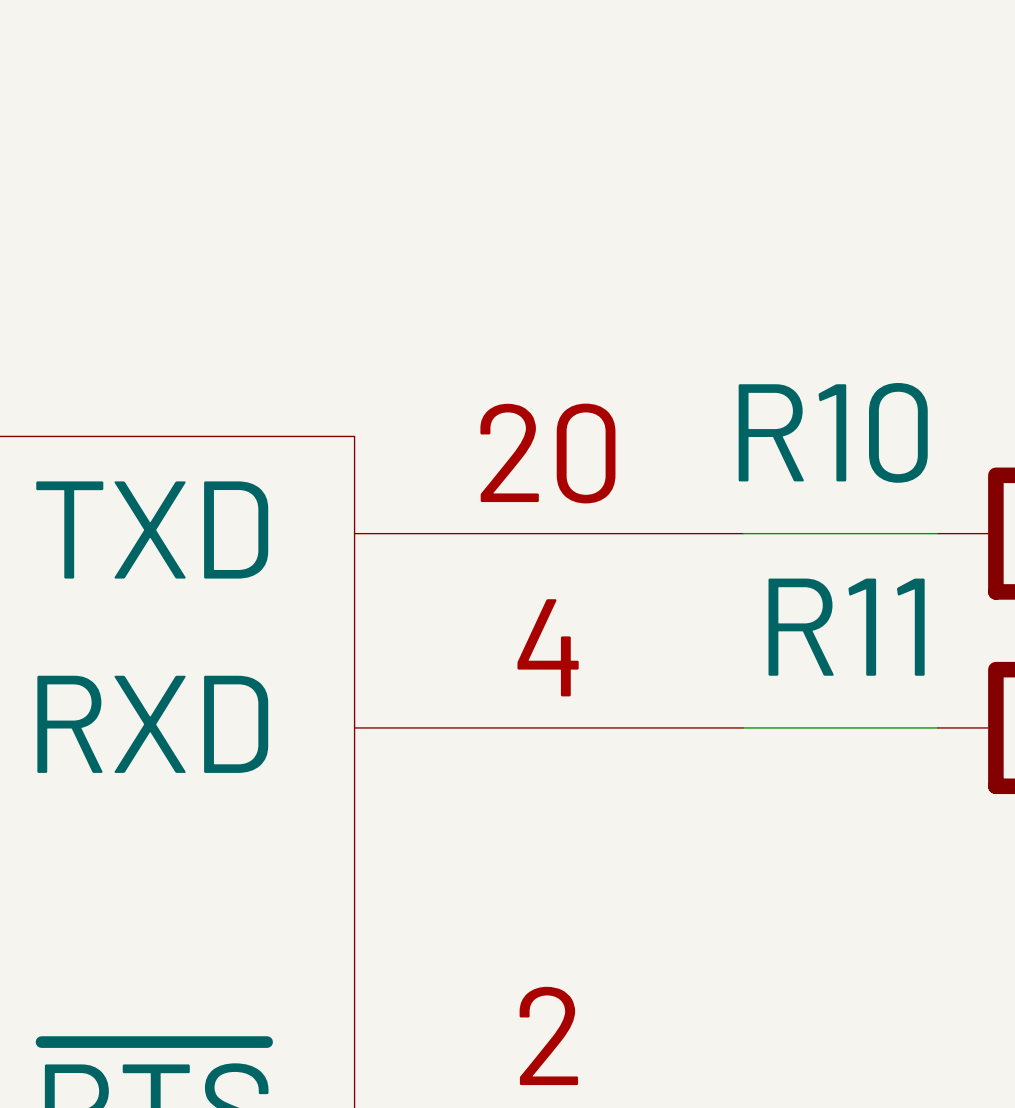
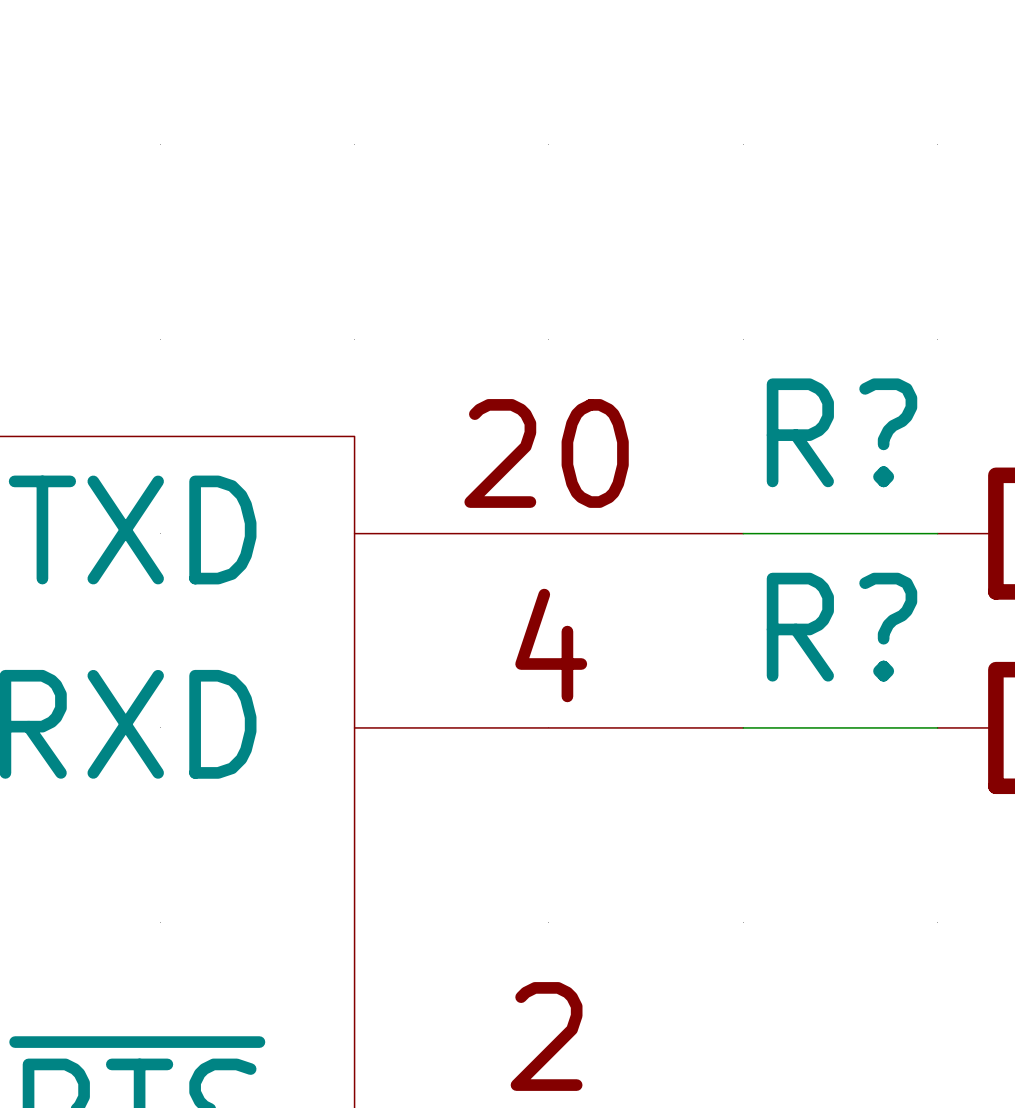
R10 name: R10 (833, 432) -> R? (841, 432)
R11 name: R11 (846, 627) -> R? (841, 627)

